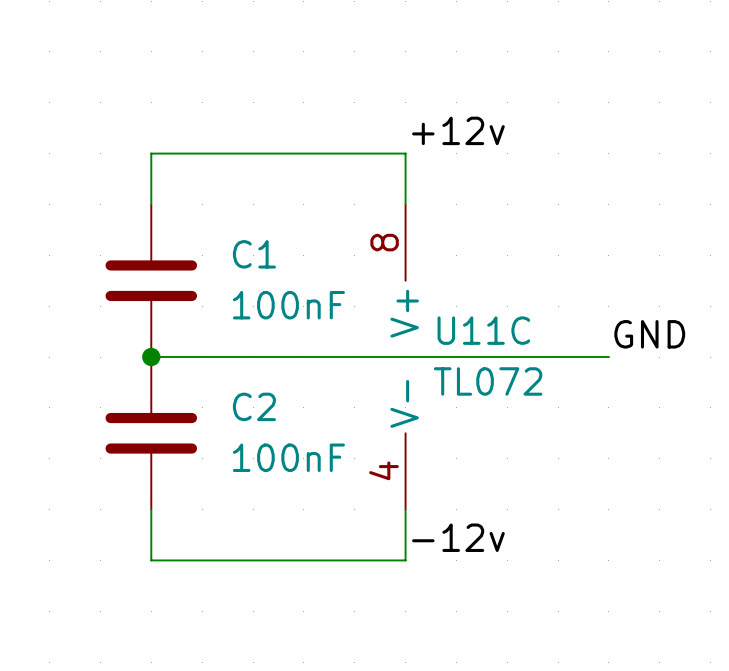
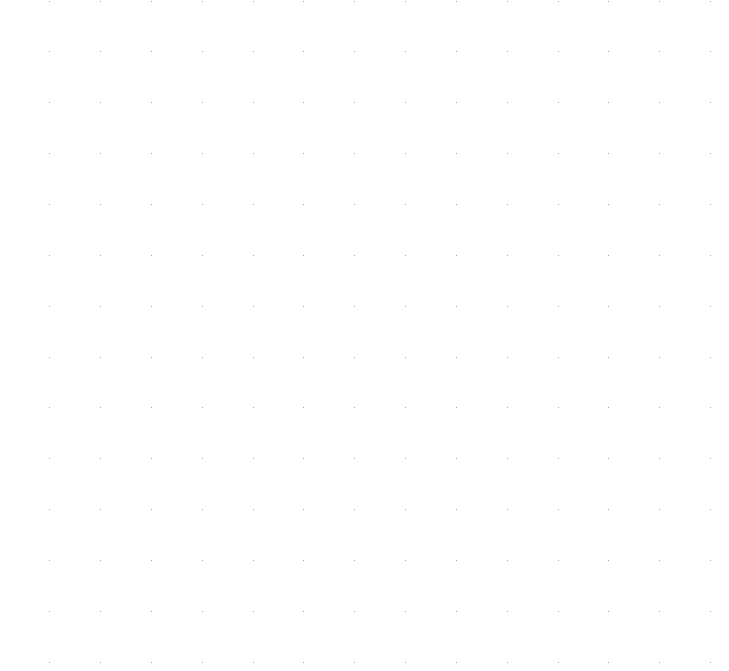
label: +12v (458, 130) -> none
wire: (151, 204) (151, 153) (405, 153) (405, 204) -> none
C1: 100nF (151, 280) -> none
label: GND (649, 334) -> none
wire: (151, 357) (608, 357) -> none
junction: (151, 357) -> none
U11C: TL072 (405, 357) -> none
C2: 100nF (151, 433) -> none
wire: (151, 509) (151, 560) (405, 560) (405, 509) -> none
label: -12v (458, 537) -> none

